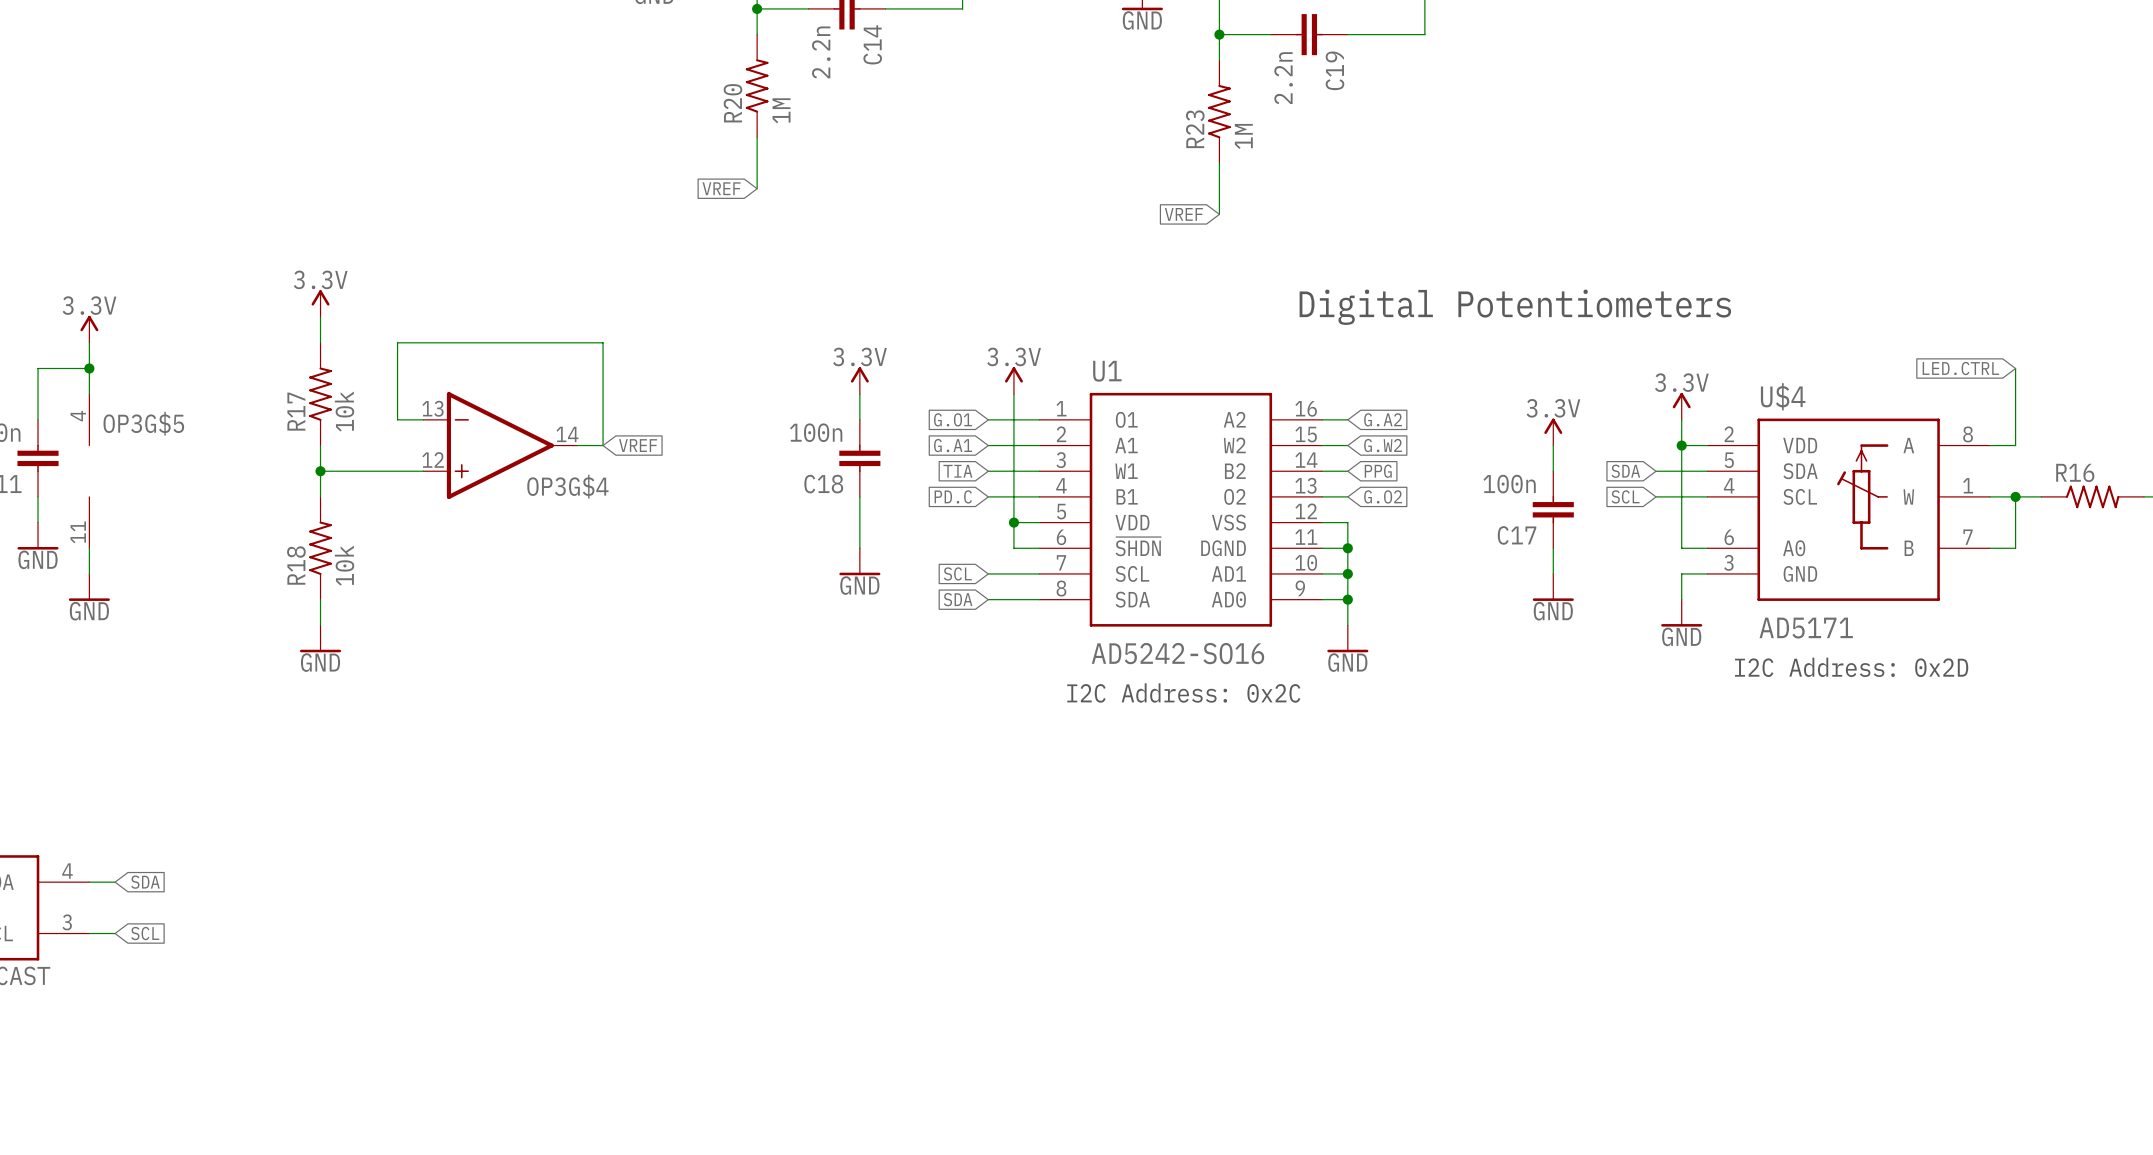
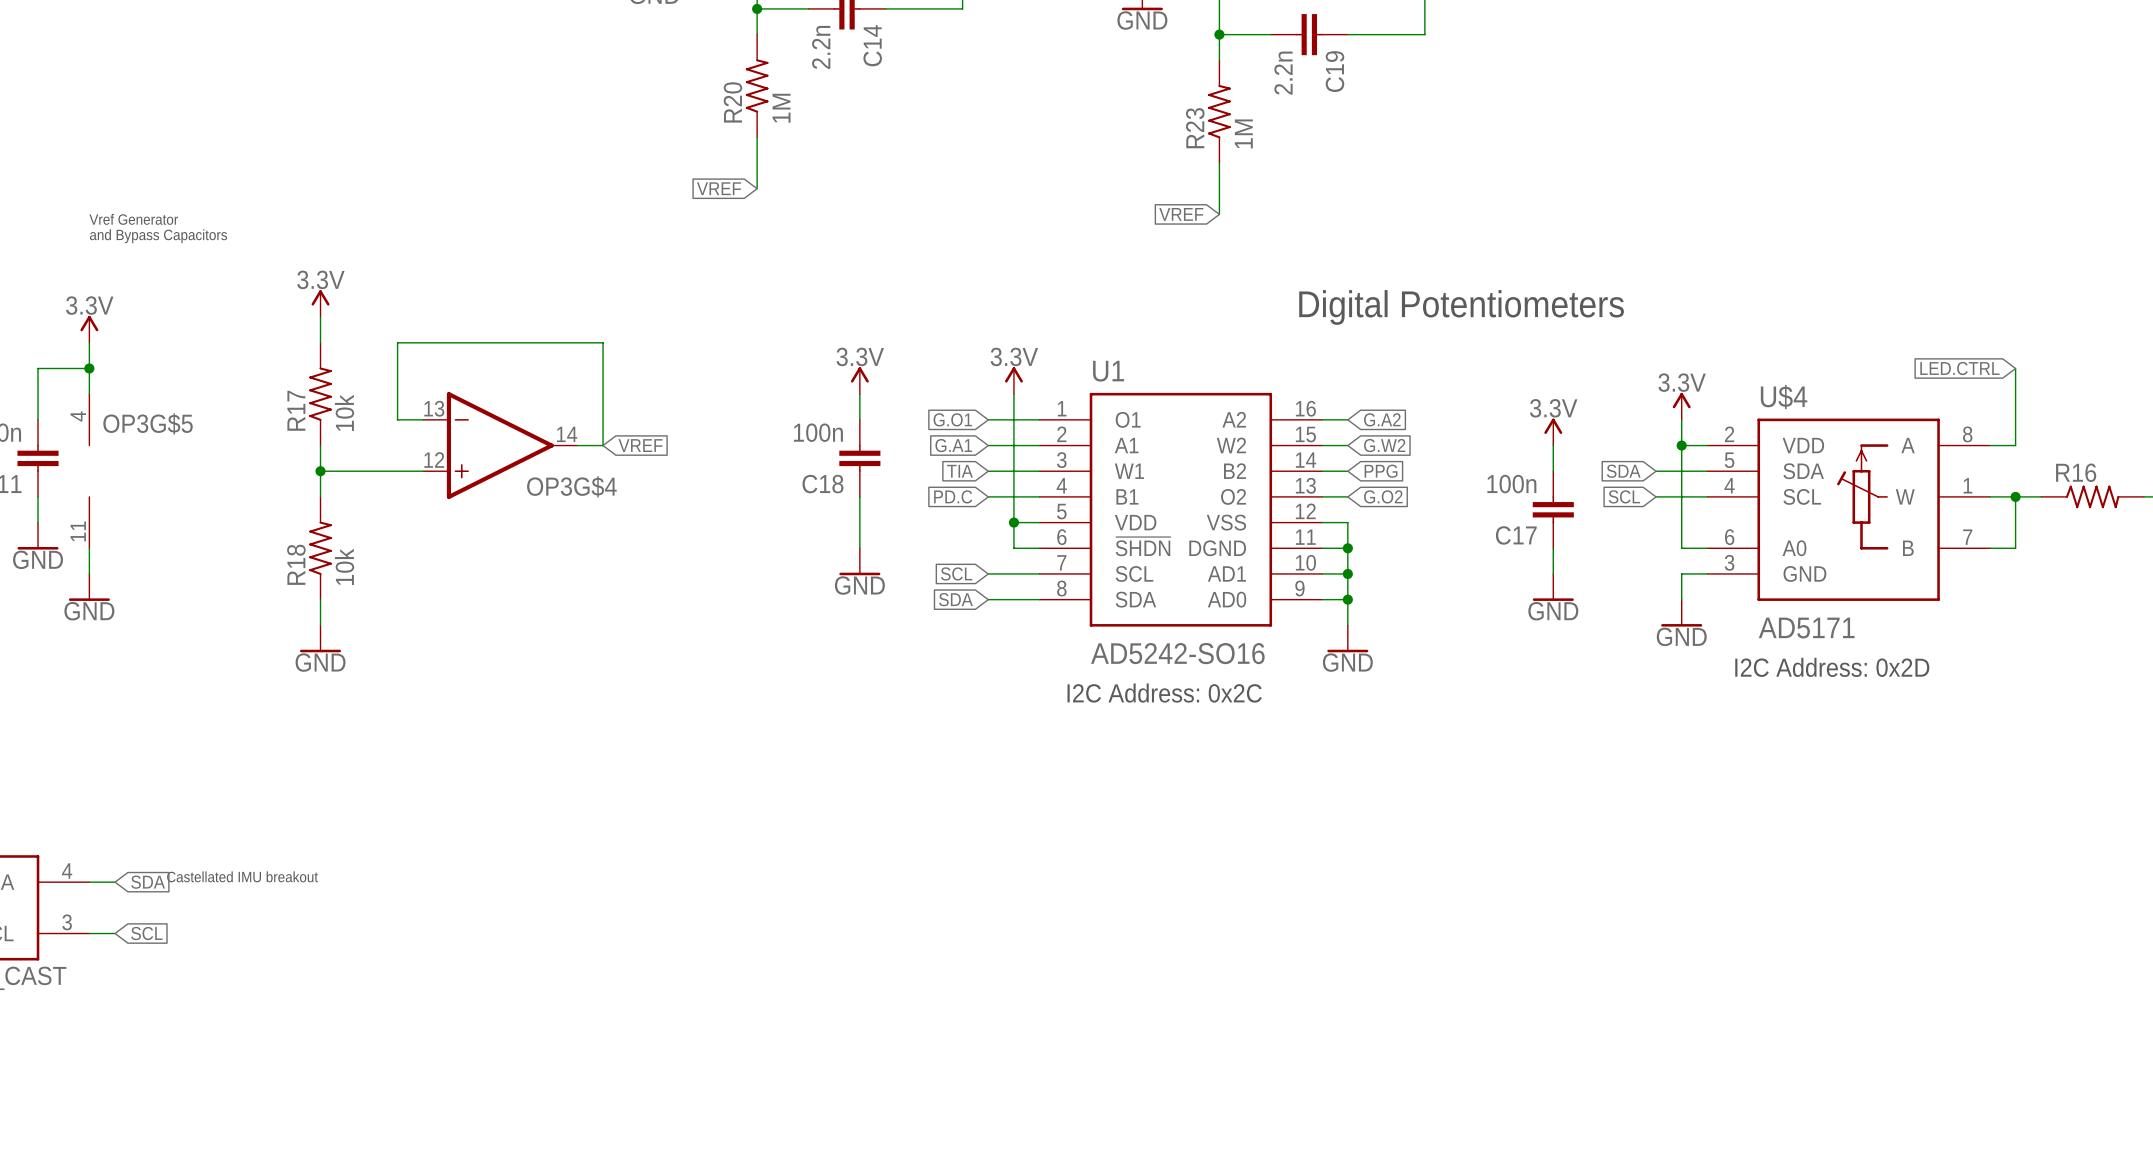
text: none -> Vref Generator (133, 219)
text: none -> and Bypass Capacitors (158, 236)
text: none -> Castellated IMU breakout (242, 876)

